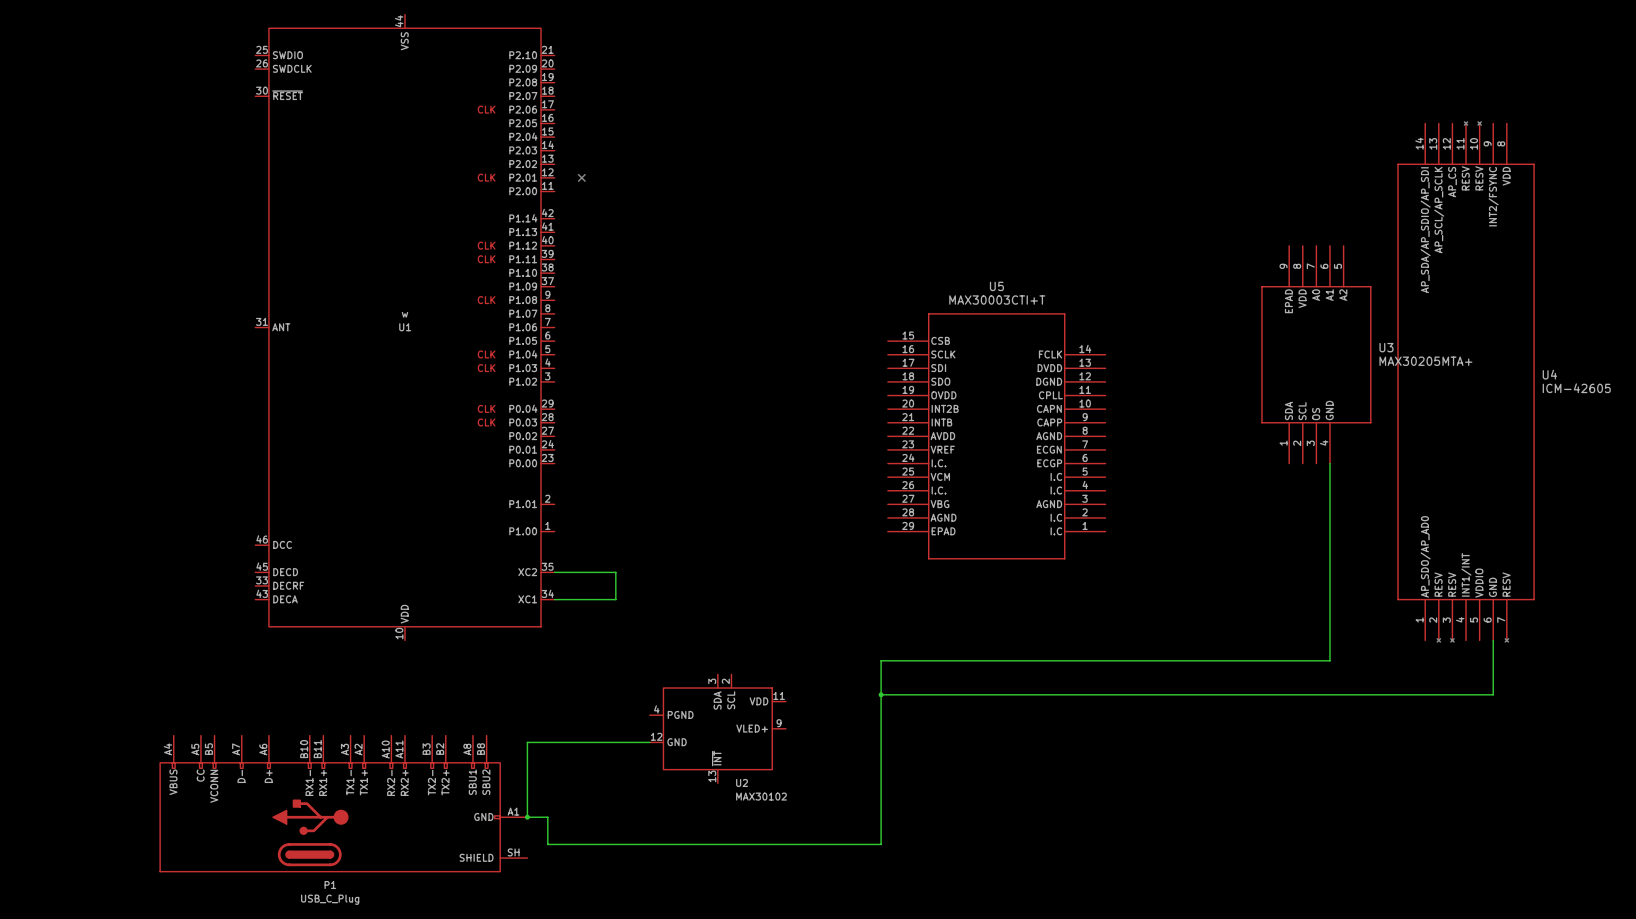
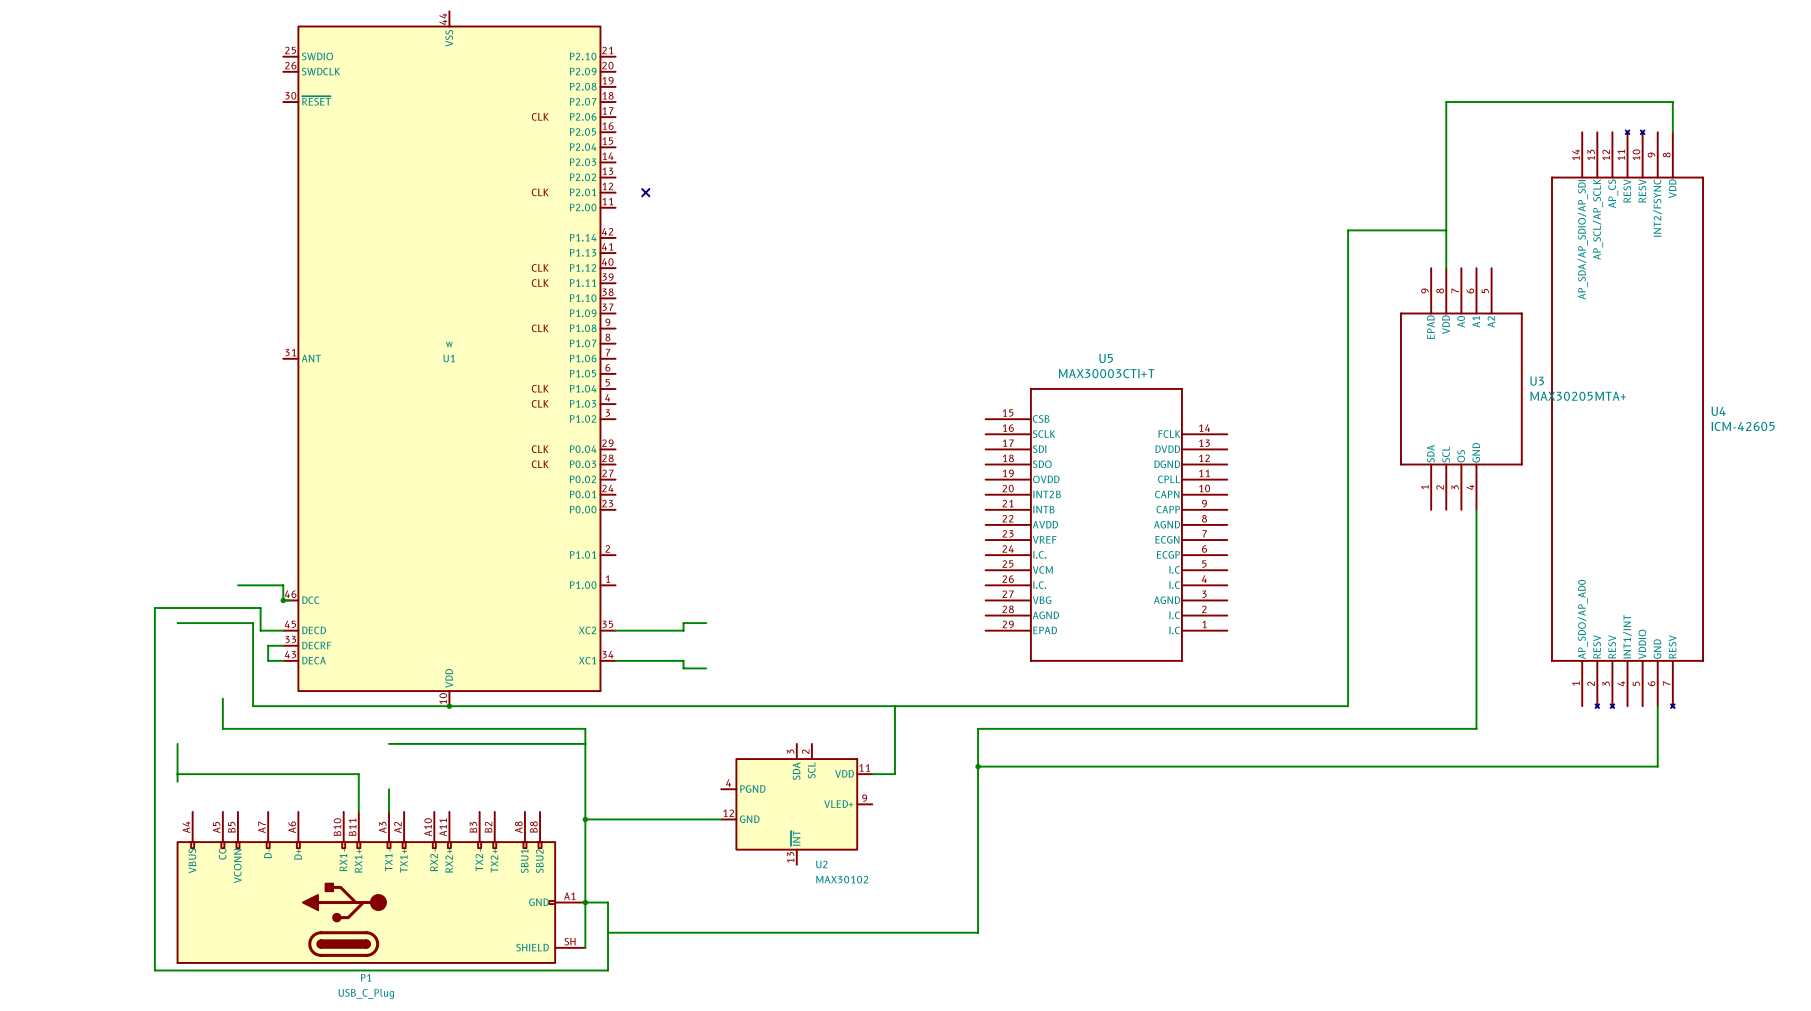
wire: none -> (1672, 132) (1672, 102) (1446, 102) (1446, 268)
wire: none -> (1446, 230) (1348, 230) (1348, 706) (253, 706) (253, 623) (177, 623)
U5 position: (996, 436) -> (1106, 524)
wire: none -> (237, 585) (283, 585) (283, 600) (290, 600)
junction: none -> (283, 600)
wire: none -> (283, 630) (260, 630) (260, 608) (154, 608) (154, 970) (608, 970) (608, 932)
wire: (615, 572) (615, 599) -> (683, 630) (683, 623) (706, 623)
wire: none -> (283, 645) (268, 645) (268, 660) (283, 660)
wire: none -> (683, 660) (683, 668) (706, 668)
wire: none -> (222, 698) (222, 728) (585, 728) (585, 819)
junction: none -> (449, 706)
wire: none -> (894, 706) (894, 774) (872, 774)
wire: none -> (177, 743) (177, 781)
wire: none -> (389, 743) (585, 743)
wire: none -> (177, 774) (358, 774) (358, 811)
wire: none -> (389, 789) (389, 811)
junction: none -> (585, 819)
wire: none -> (585, 902) (585, 947)

